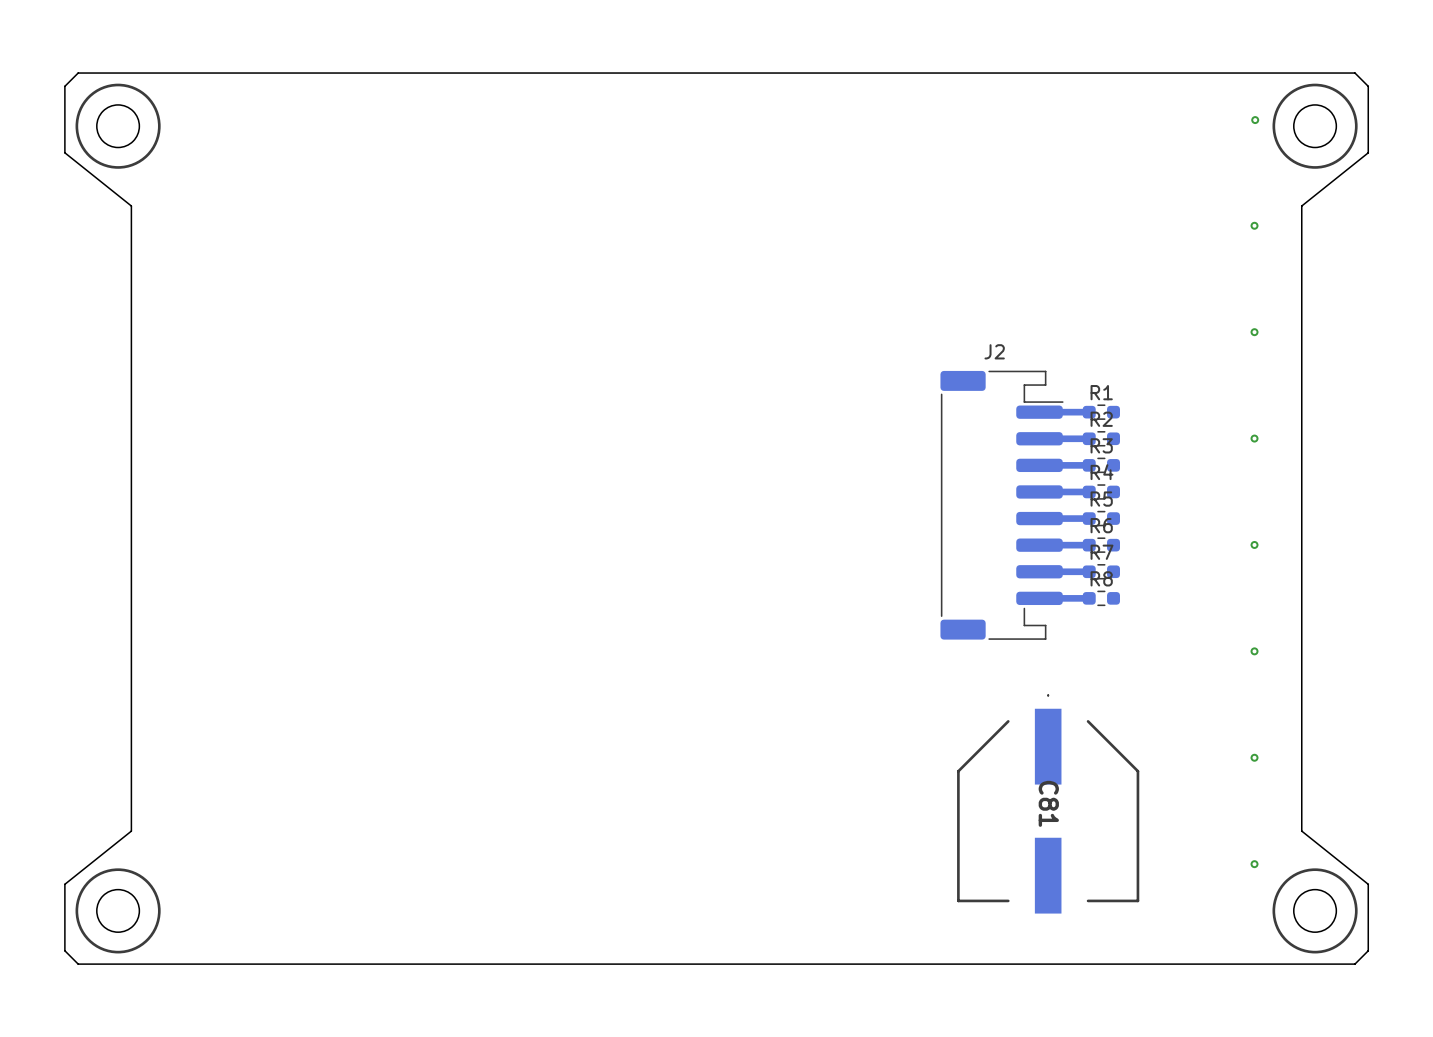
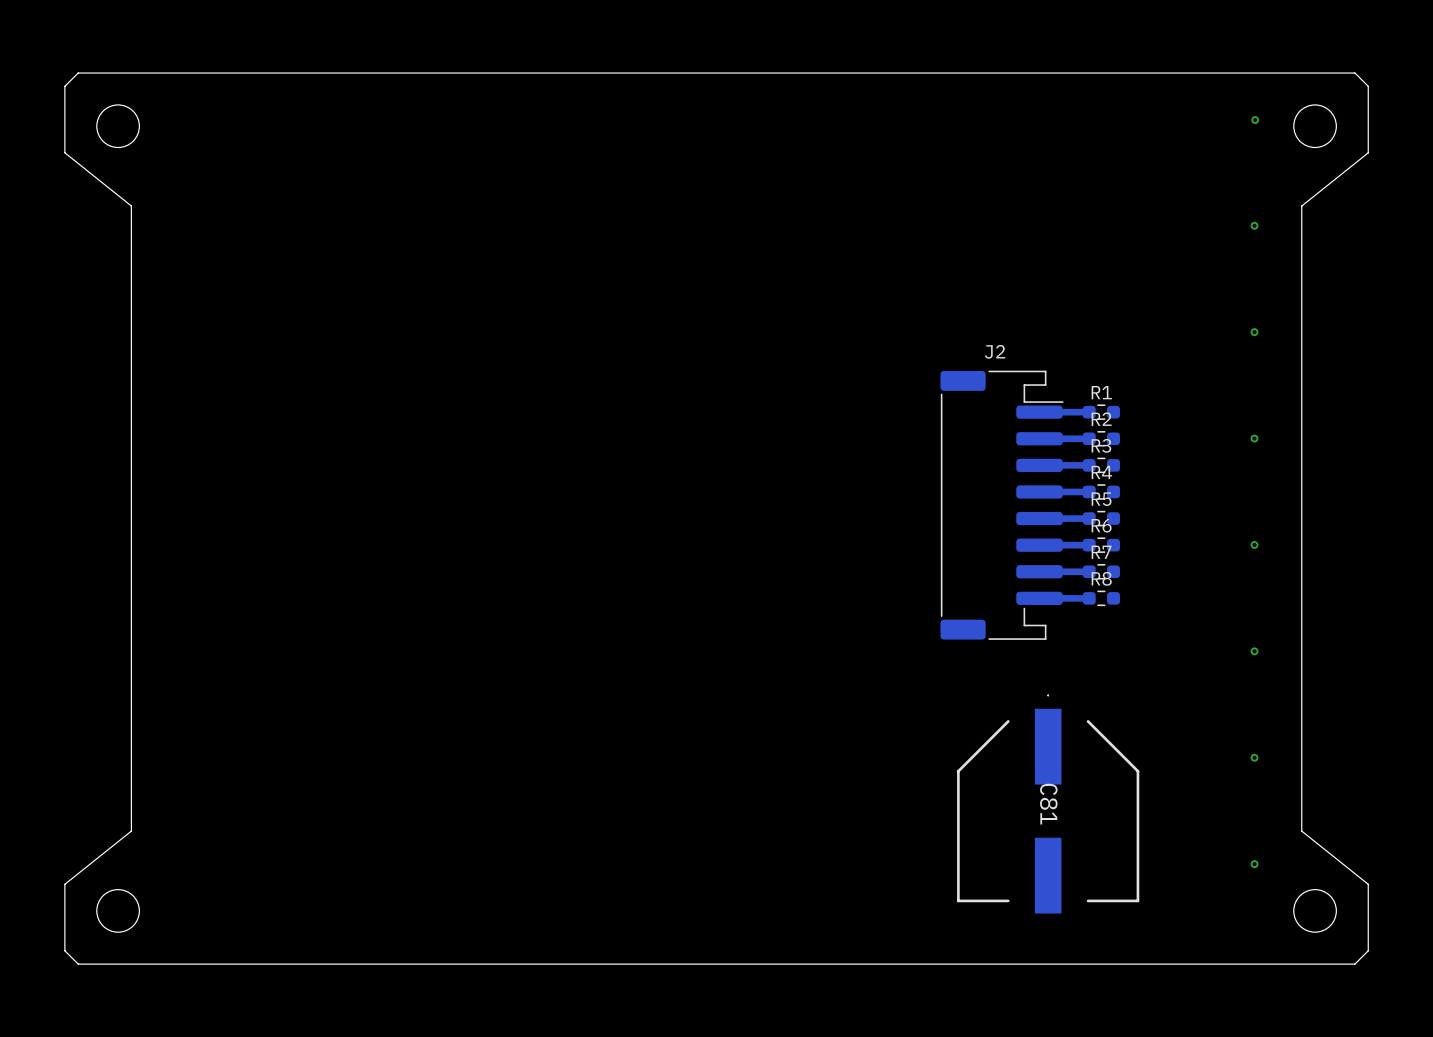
drawing: [75, 83, 161, 169] -> none
drawing: [1272, 83, 1358, 169] -> none
drawing: [75, 868, 161, 954] -> none
drawing: [1272, 868, 1358, 954] -> none

